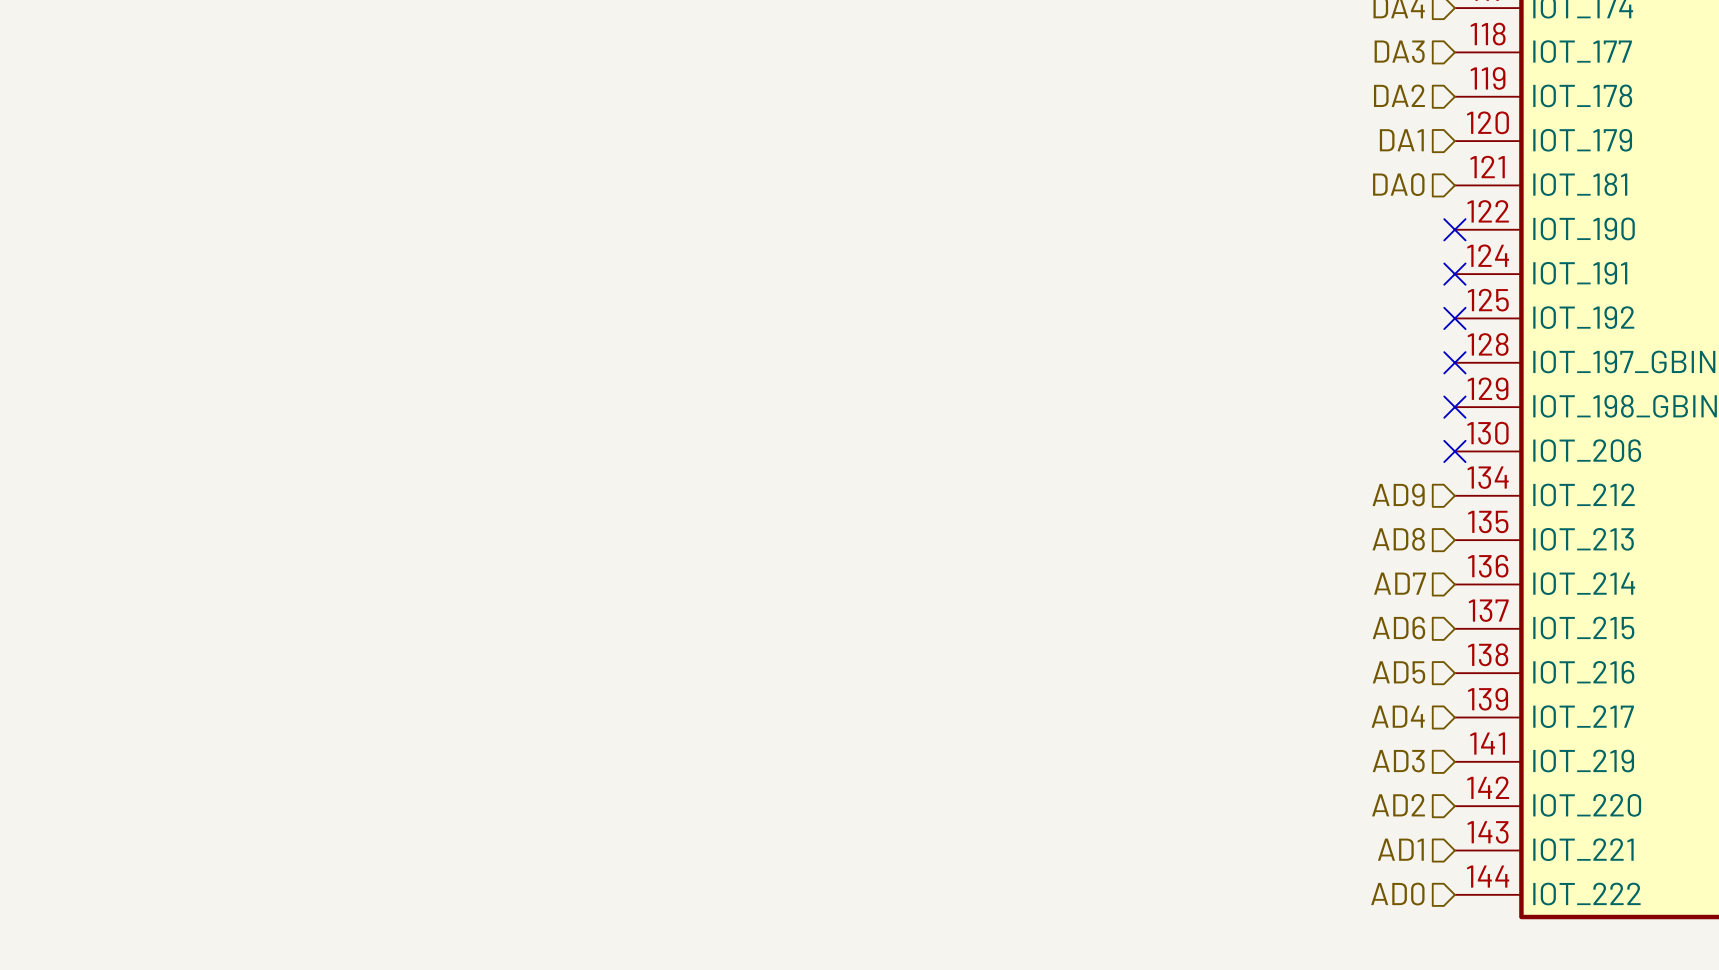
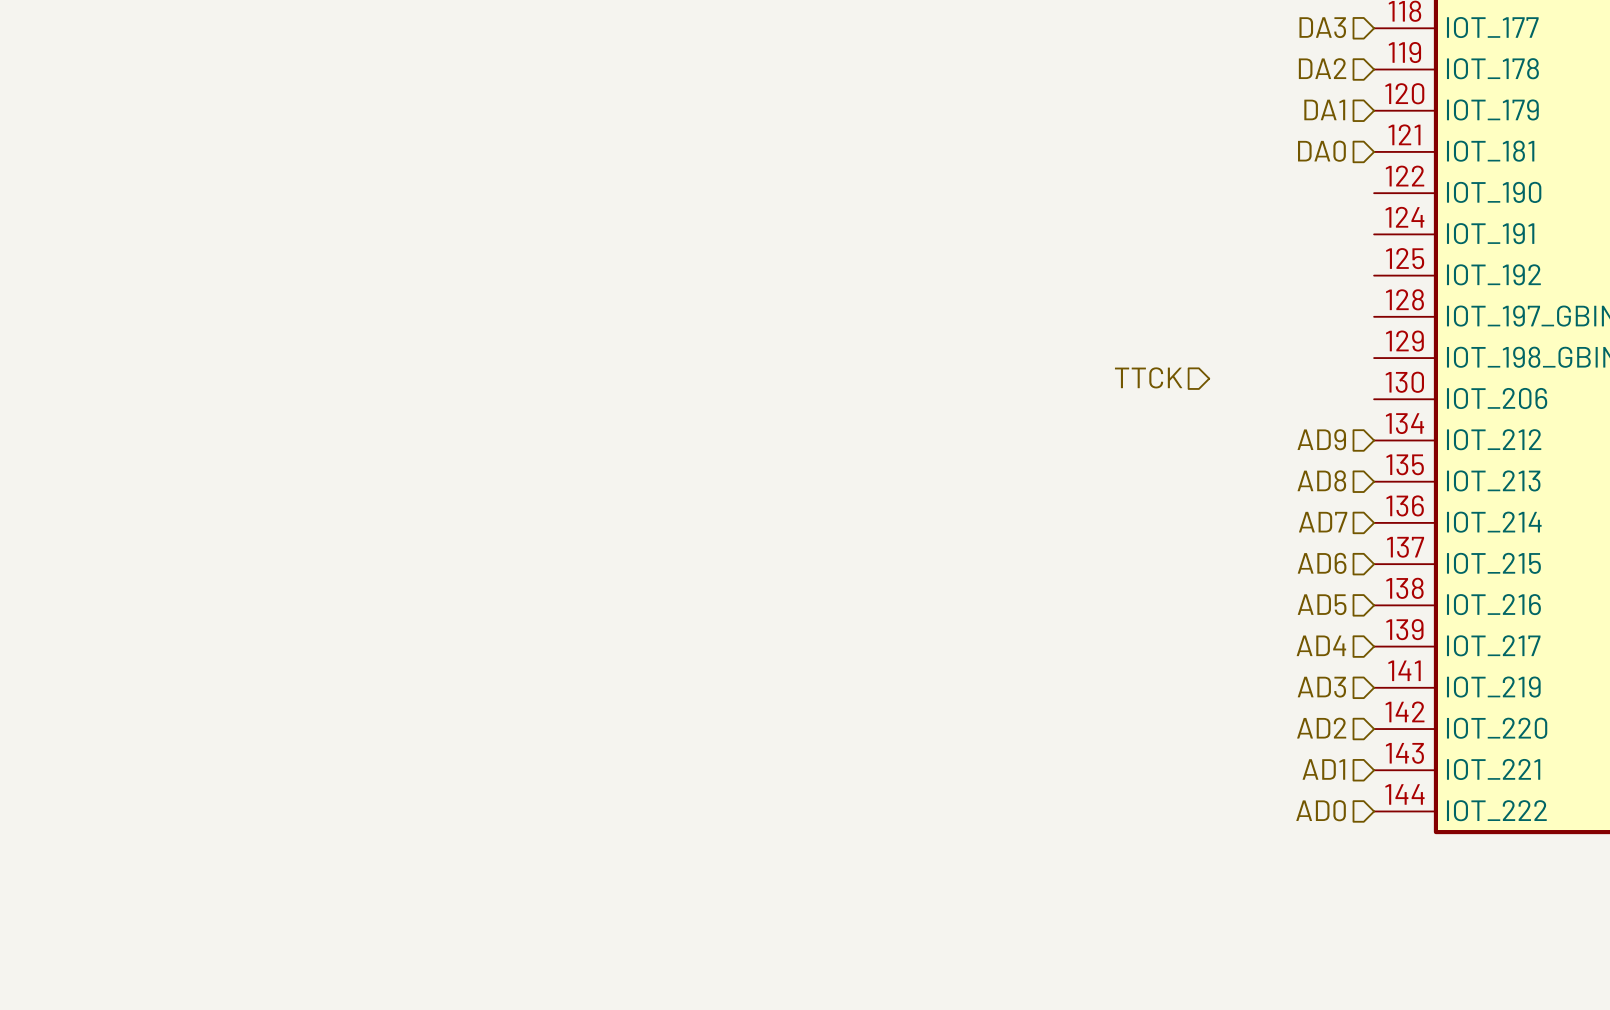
no-connect mark: (1454, 229) -> none
no-connect mark: (1454, 274) -> none
no-connect mark: (1454, 318) -> none
no-connect mark: (1454, 362) -> none
no-connect mark: (1454, 407) -> none
hierarchical label: none -> TTCK (1148, 377)
no-connect mark: (1454, 451) -> none

